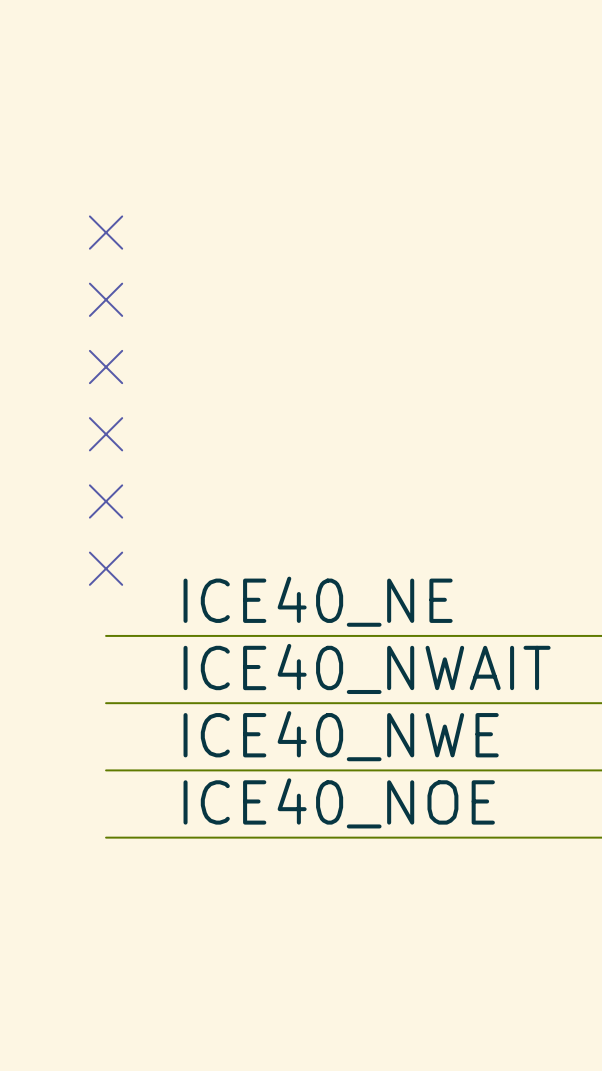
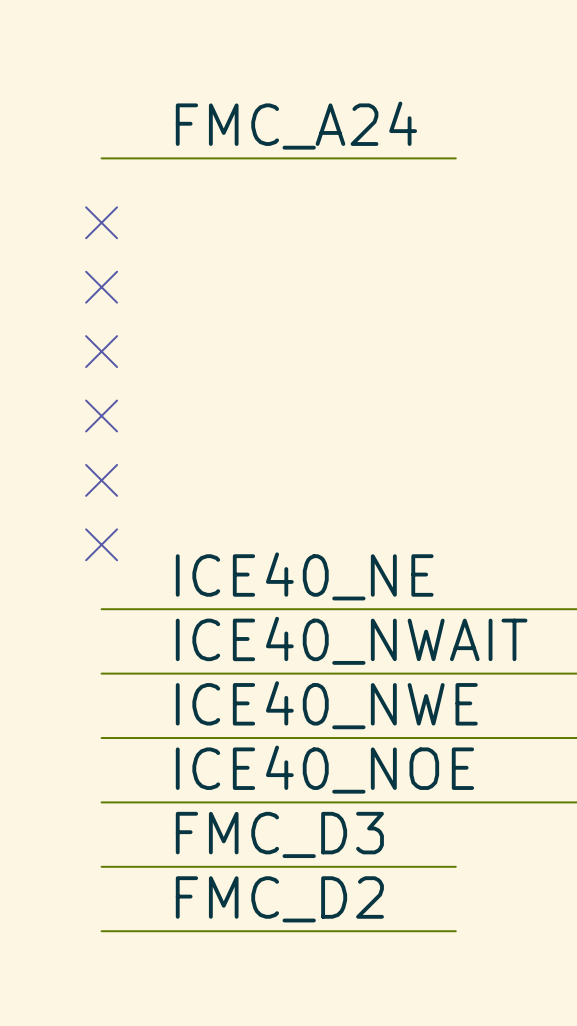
label: none -> FMC_A24 (296, 125)
wire: none -> (101, 158) (455, 158)
label: none -> FMC_D3 (279, 834)
wire: none -> (101, 866) (455, 866)
label: none -> FMC_D2 (279, 899)
wire: none -> (101, 931) (455, 931)

